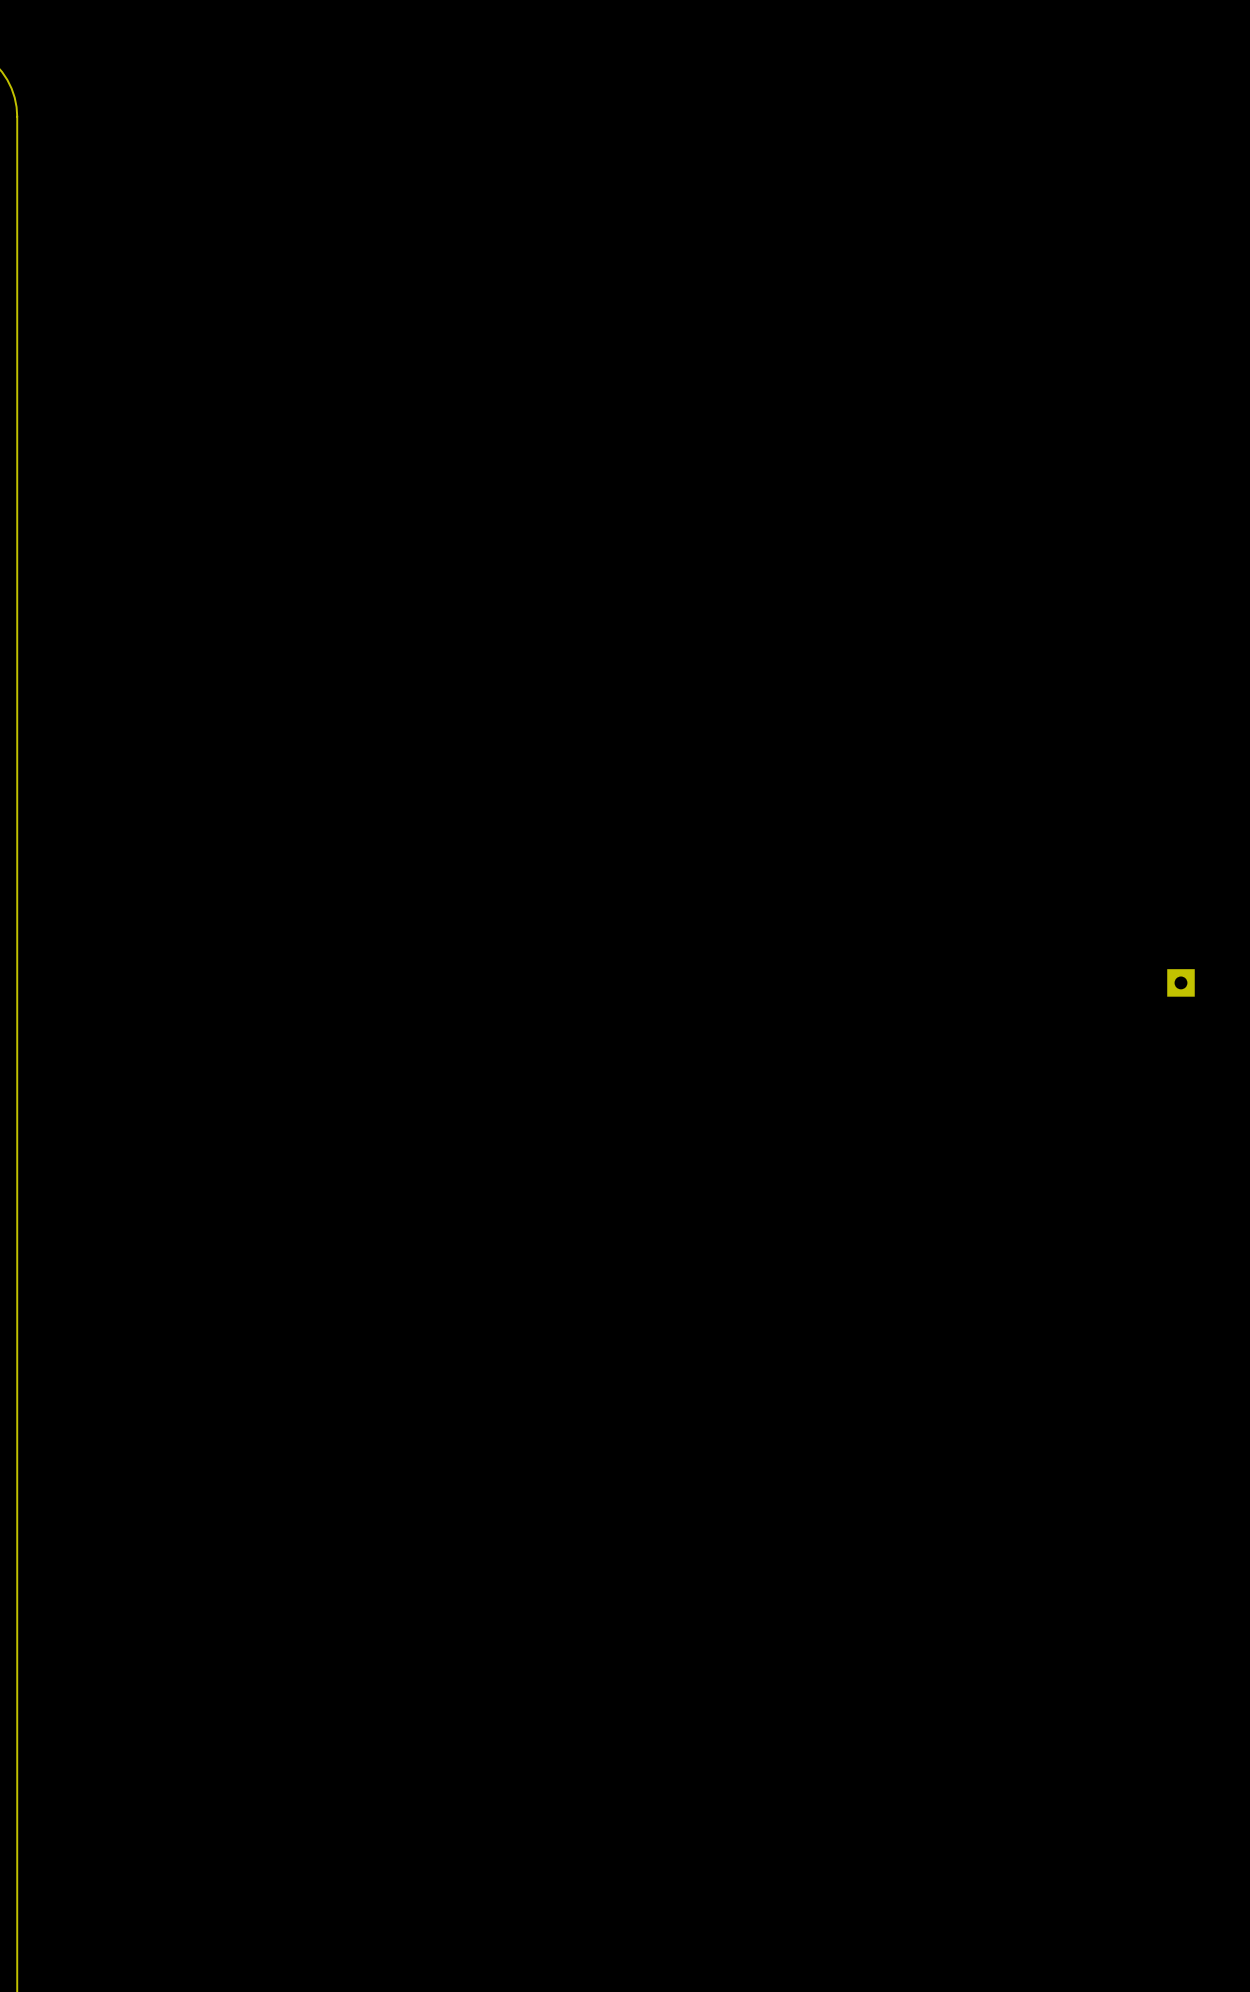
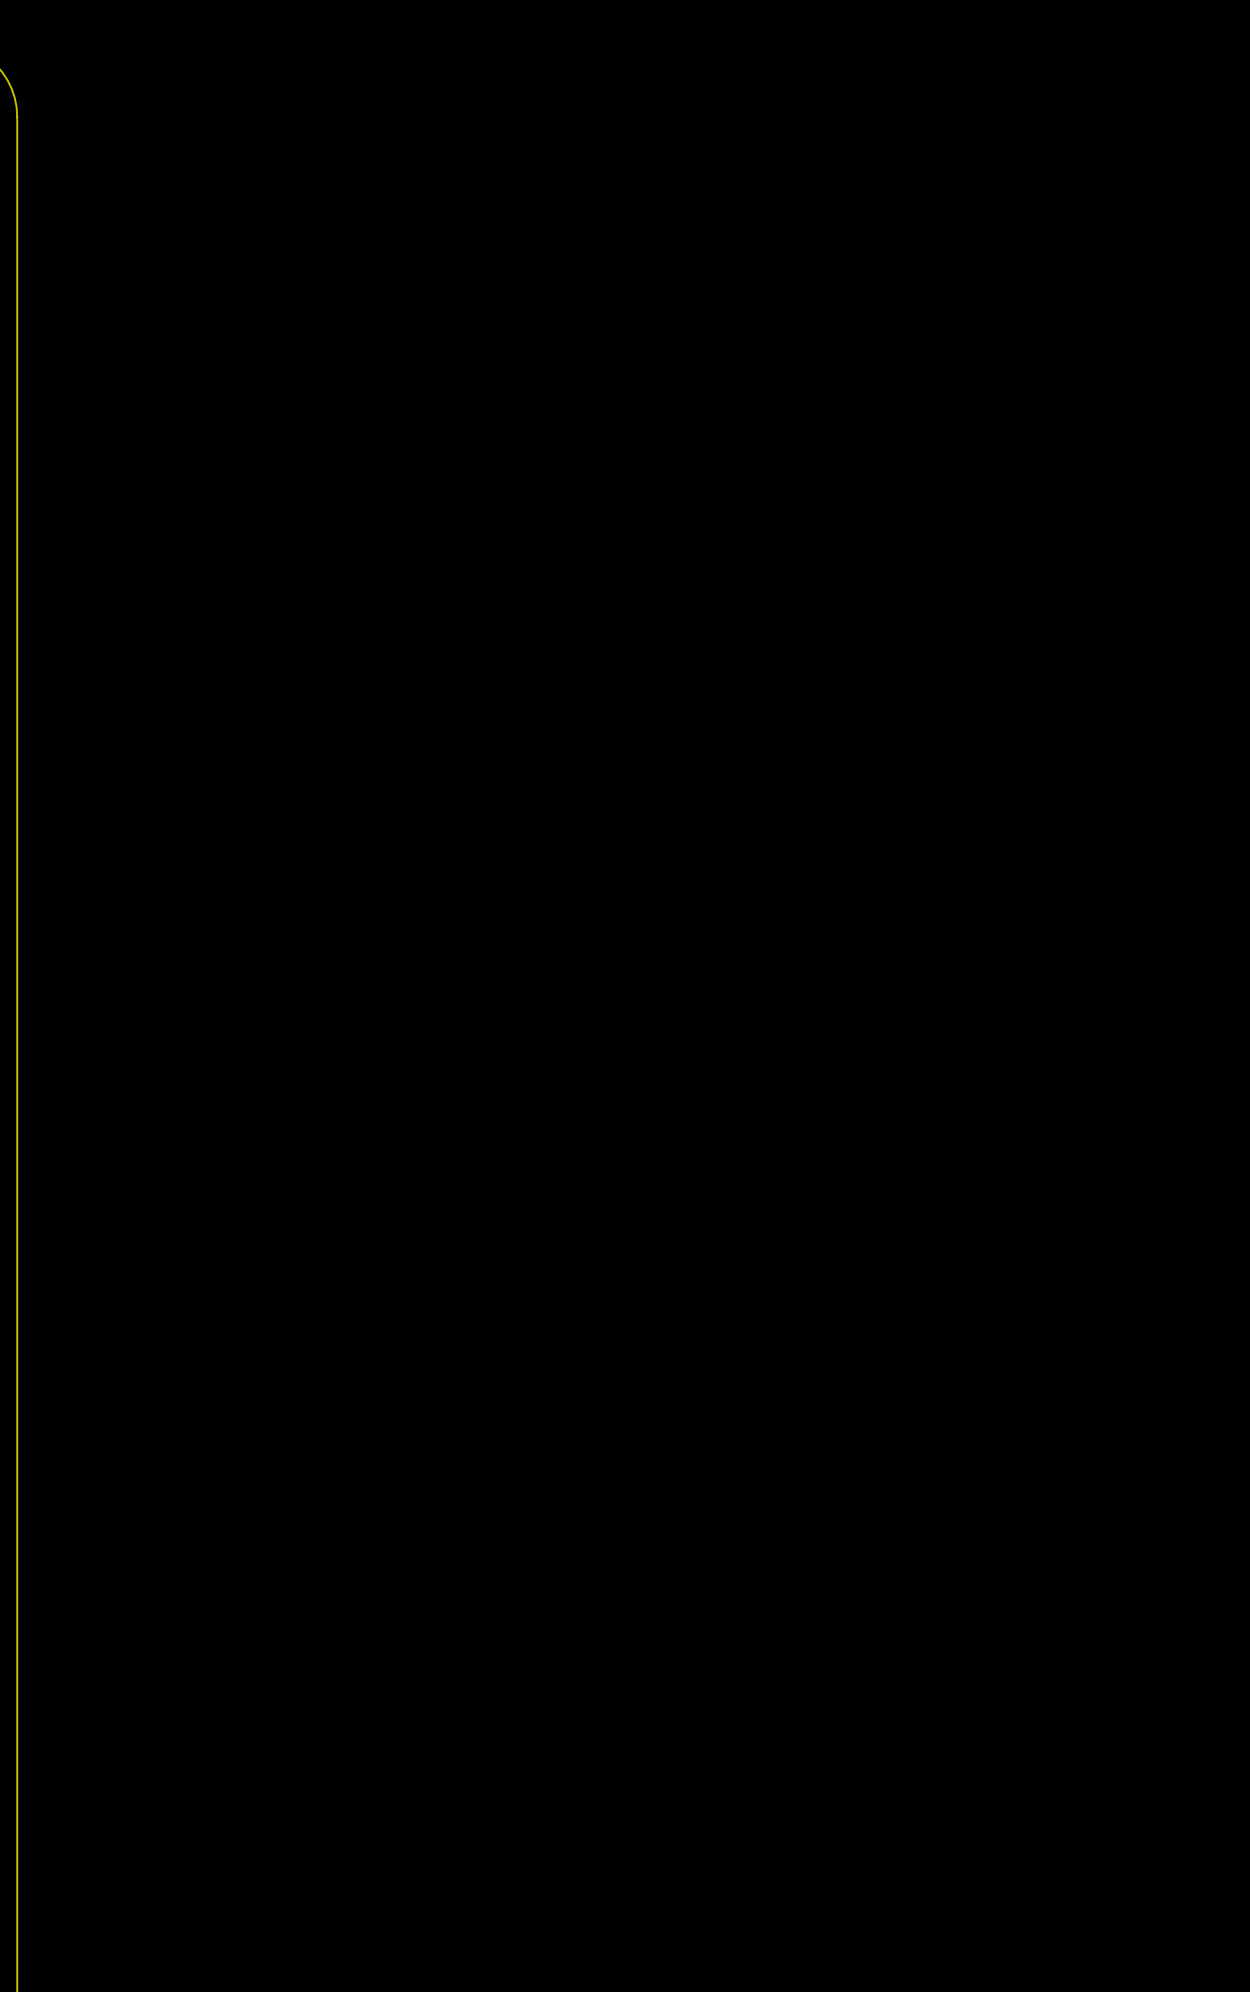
part: (1180, 982) -> none

